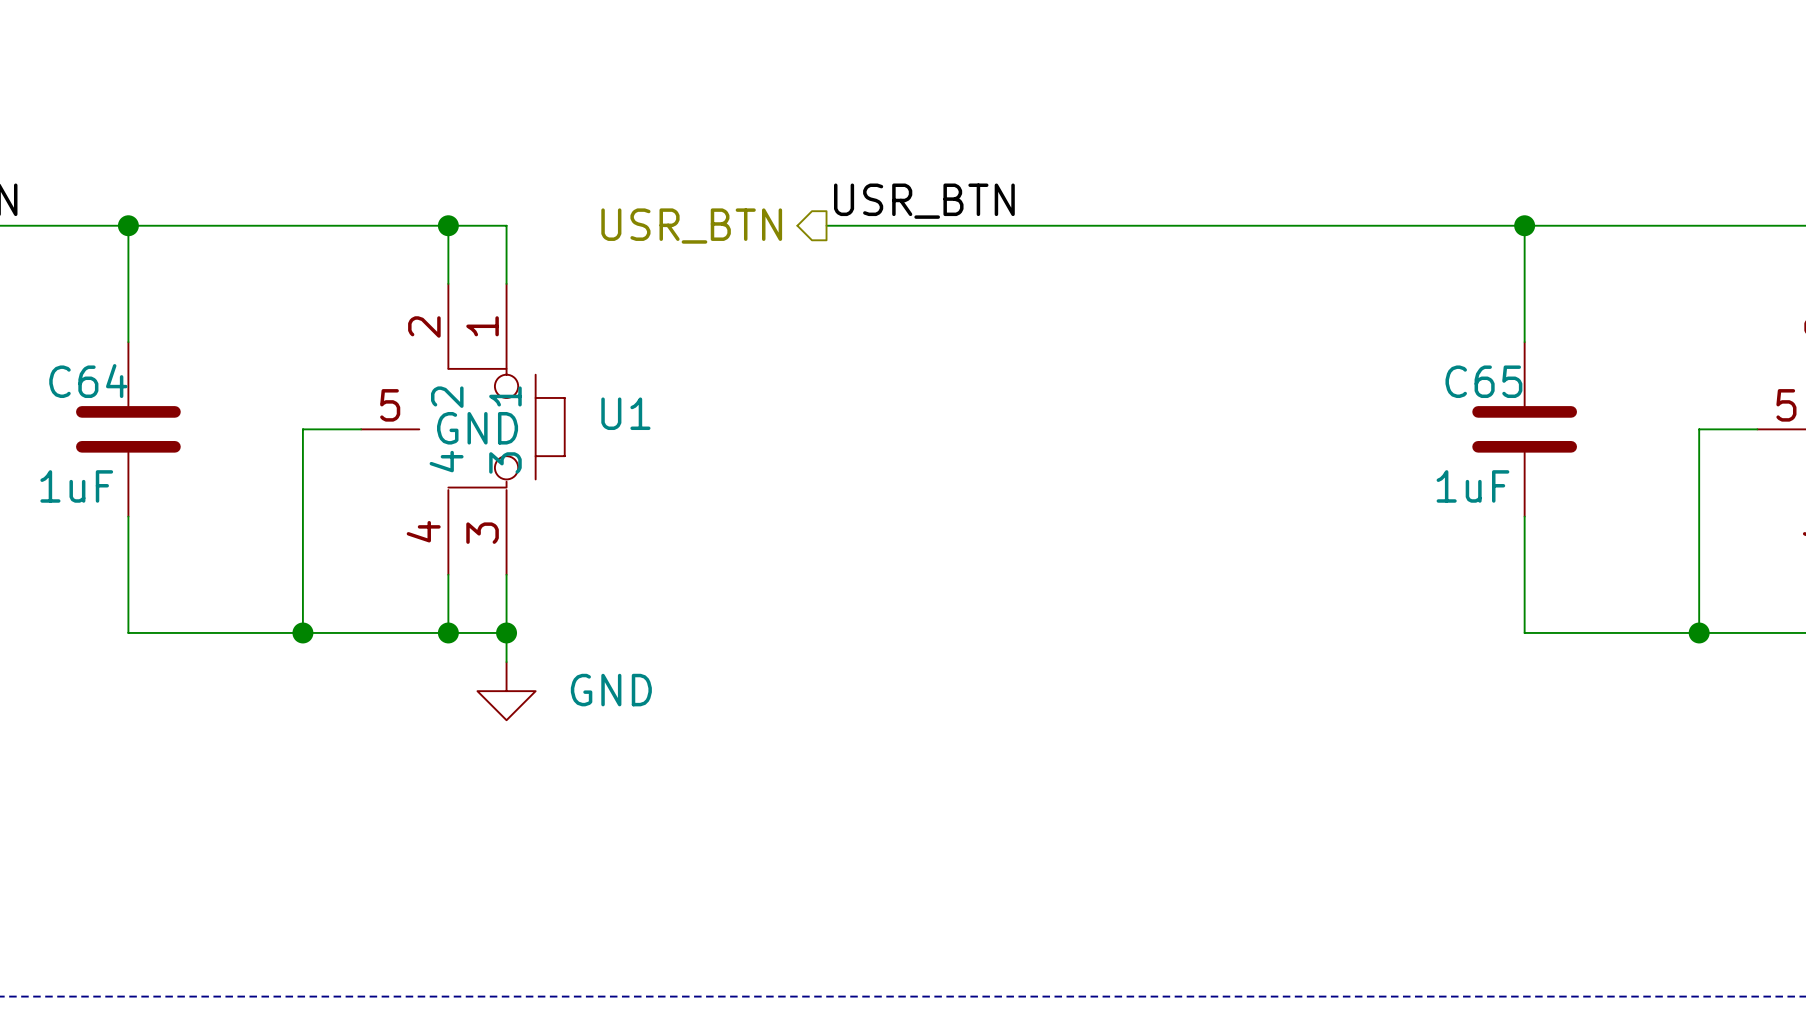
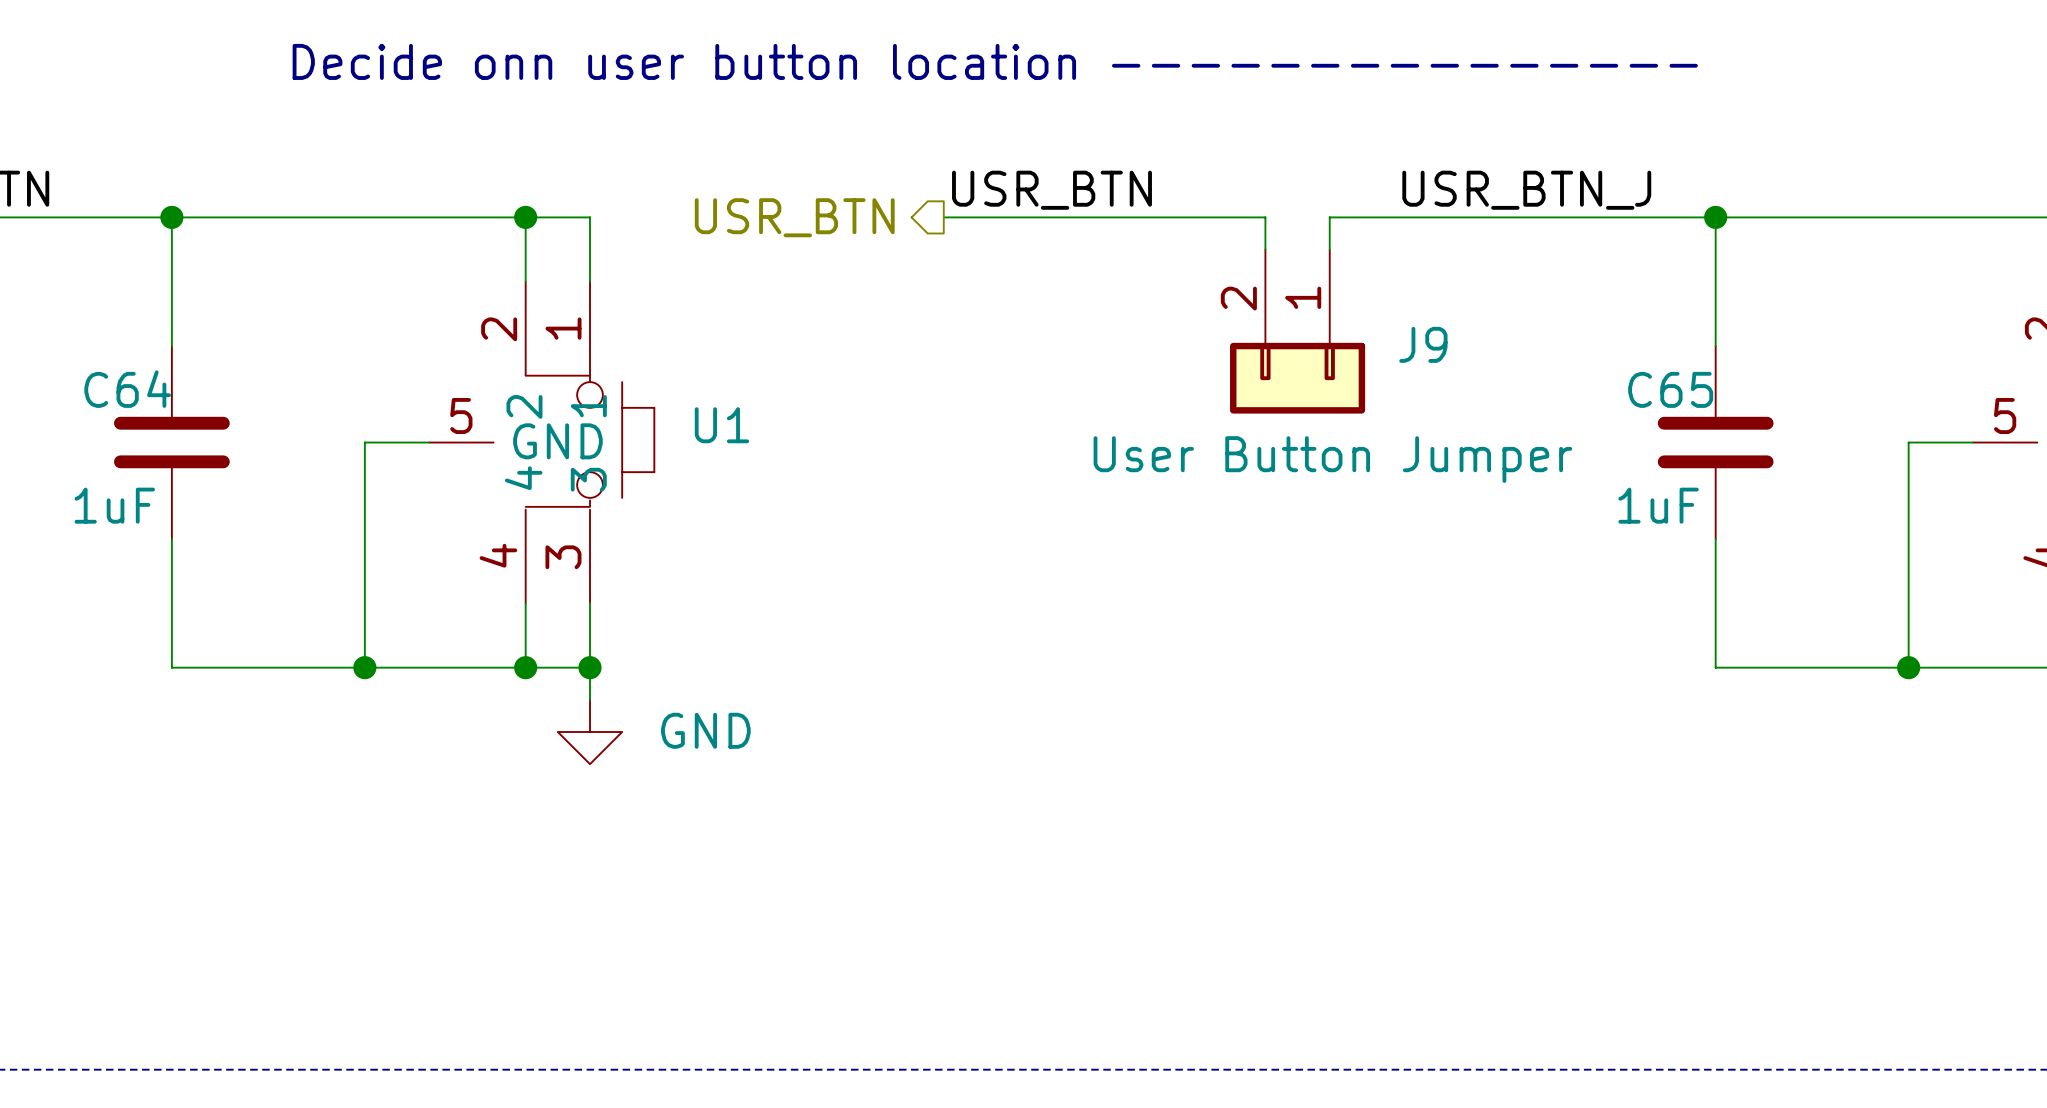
text: none -> Decide onn user button location --------------- (995, 61)
label: none -> USR_BTN_J (1526, 190)
wire: (1117, 225) (1175, 225) -> (1265, 217) (1265, 249)
wire: none -> (1329, 217) (1329, 249)
J9: none -> User Button Jumper (1297, 331)

